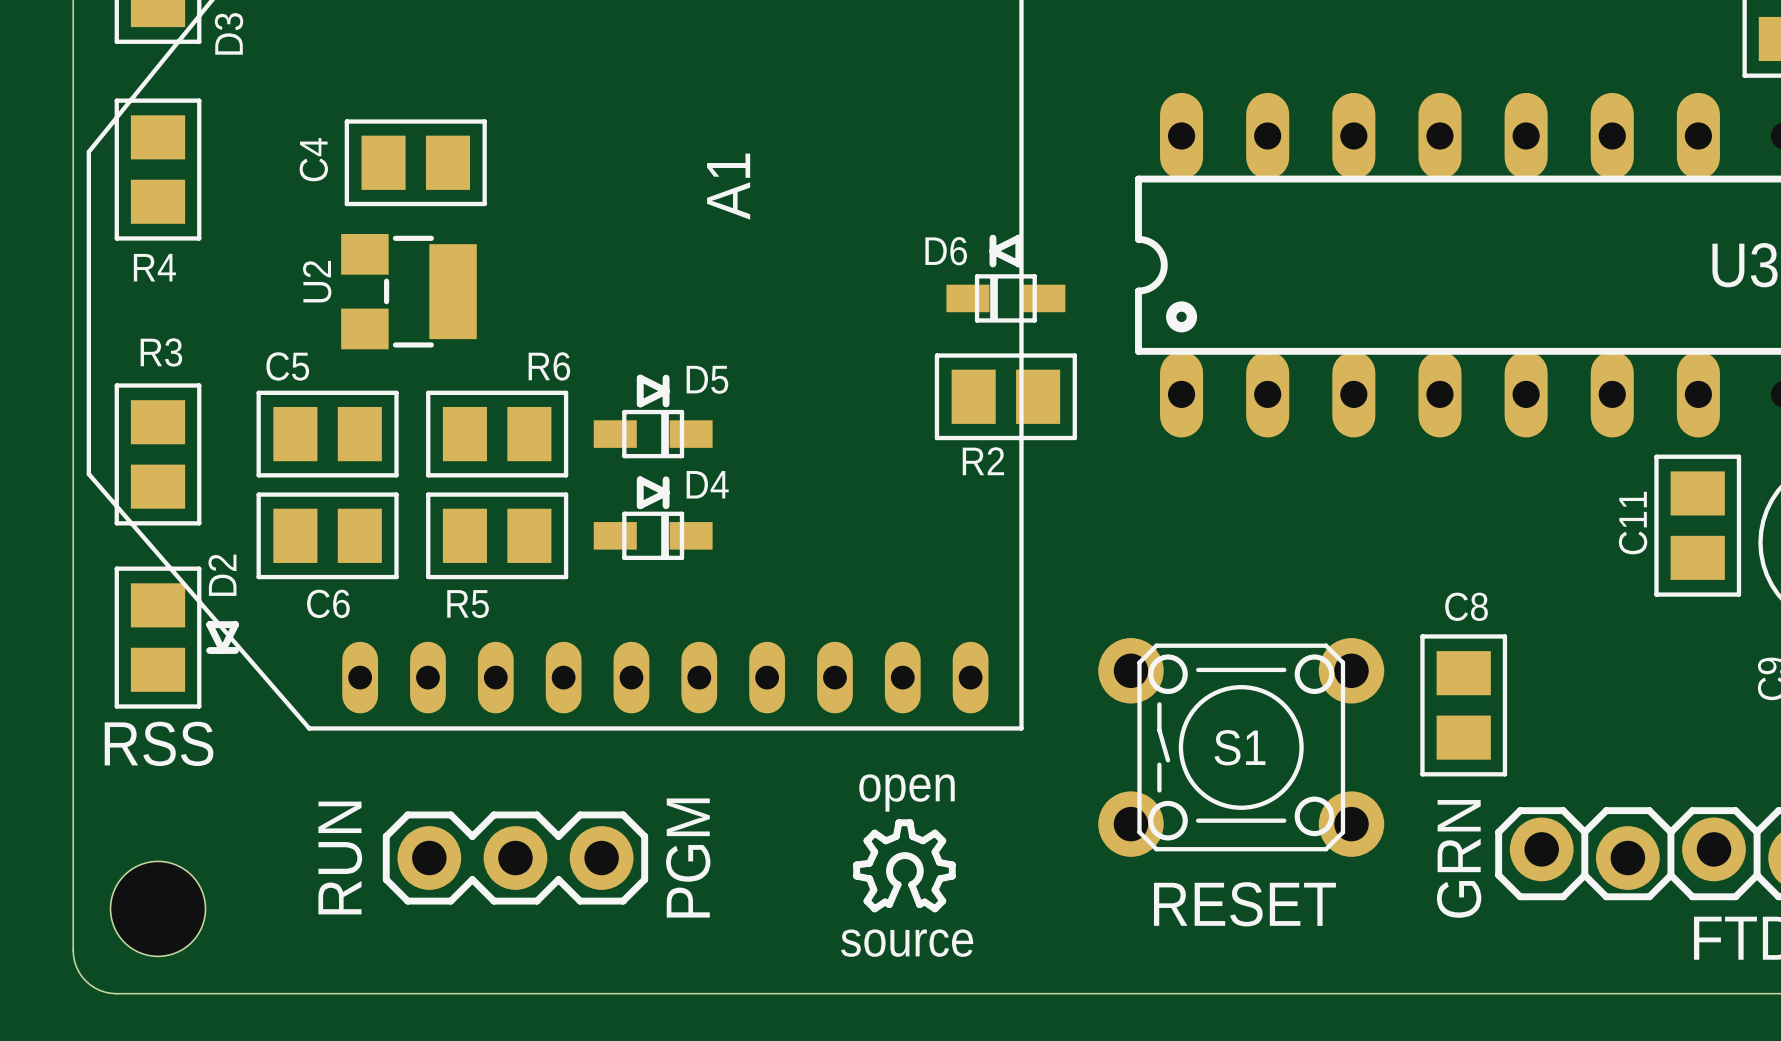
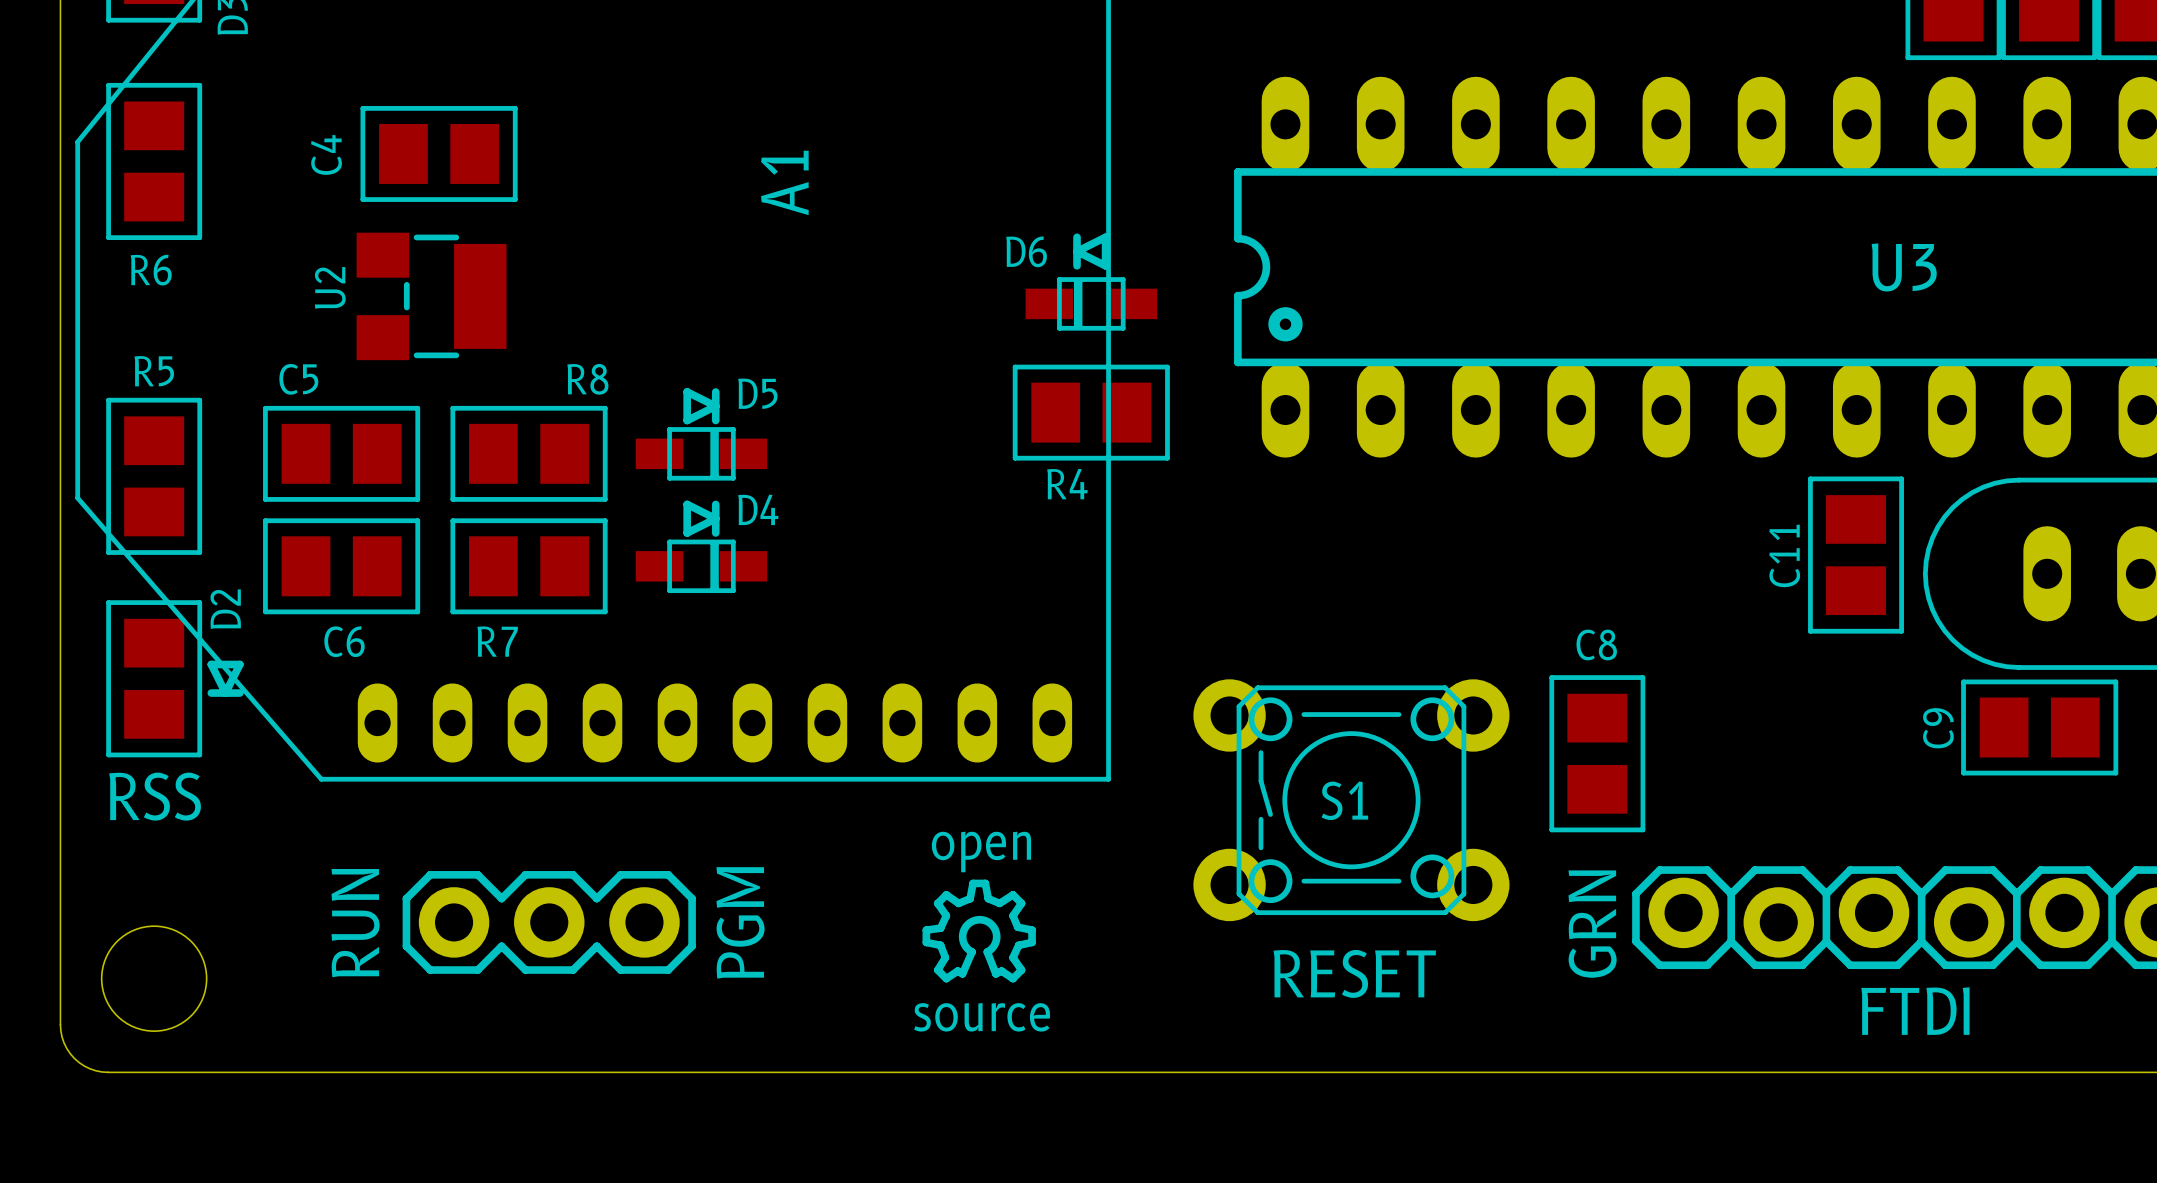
R4 name: R4 (154, 267) -> R6 (151, 270)
R3 name: R3 (161, 352) -> R5 (154, 371)
R6 name: R6 (549, 366) -> R8 (587, 379)
R2 name: R2 (983, 461) -> R4 (1067, 484)
R5 name: R5 (468, 604) -> R7 (497, 641)

